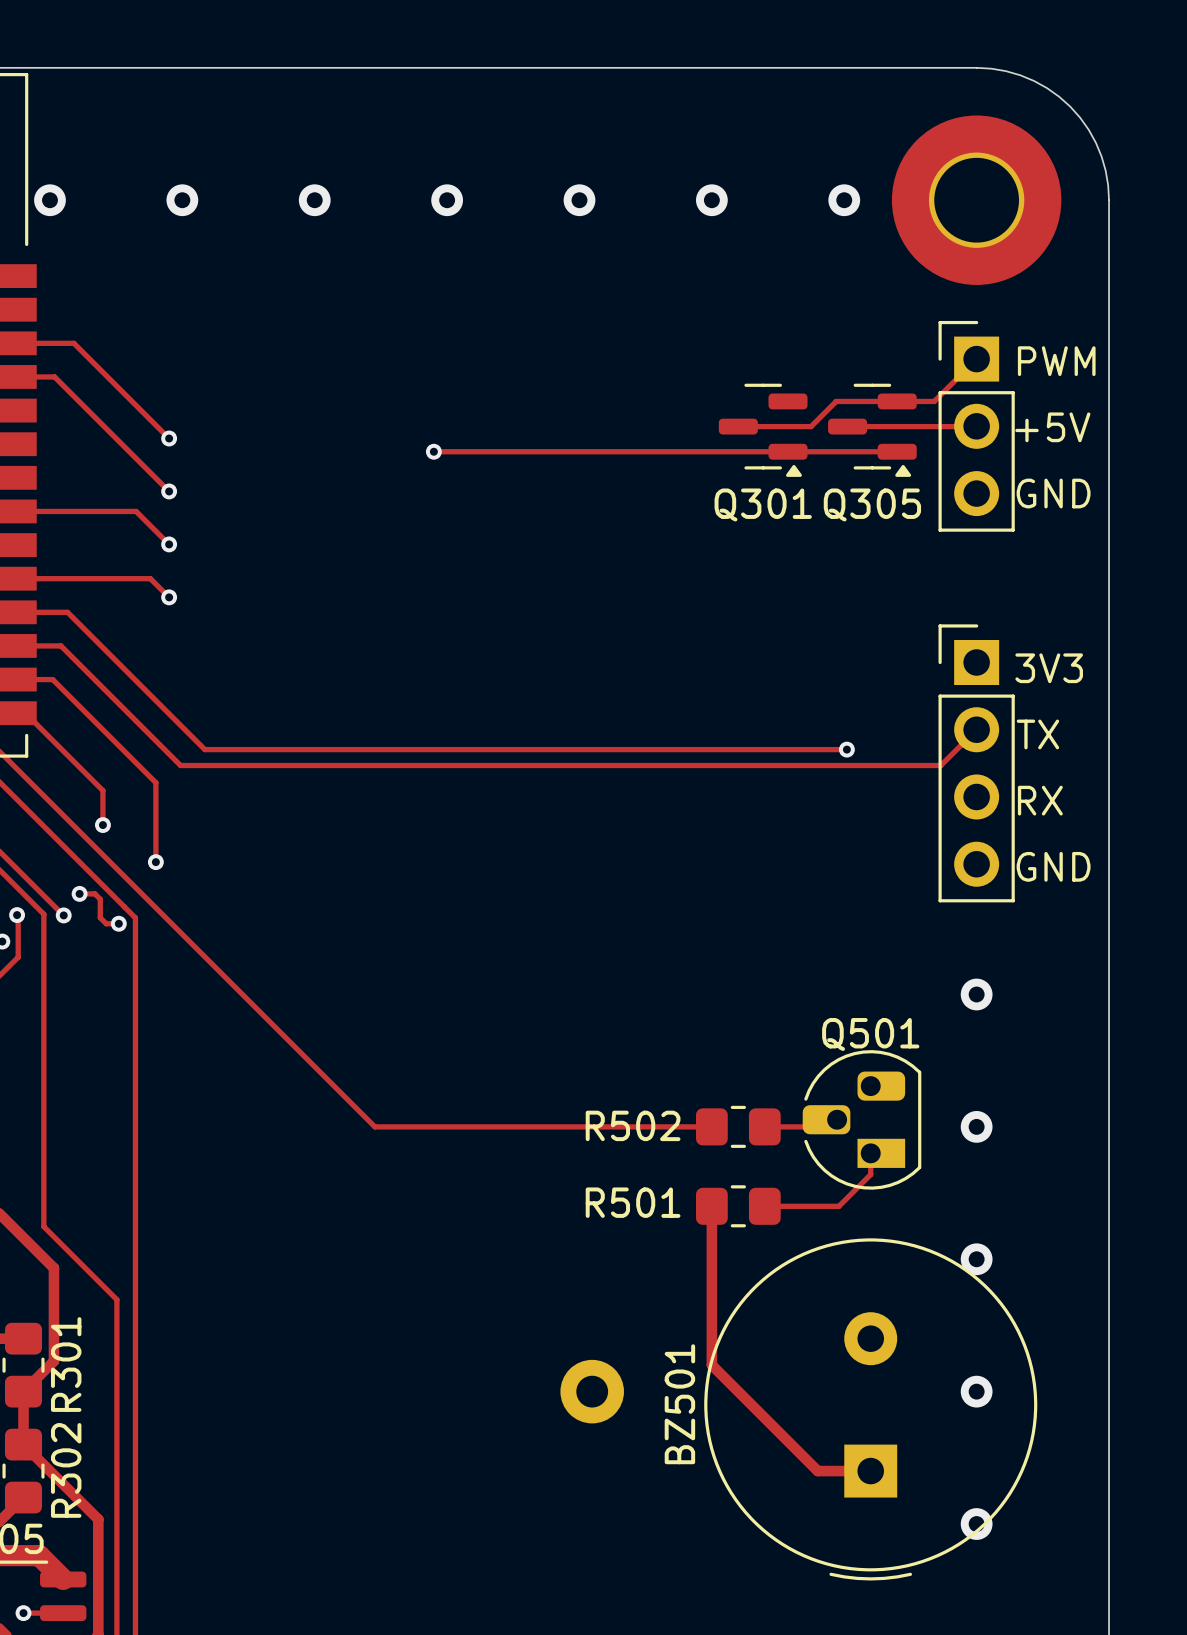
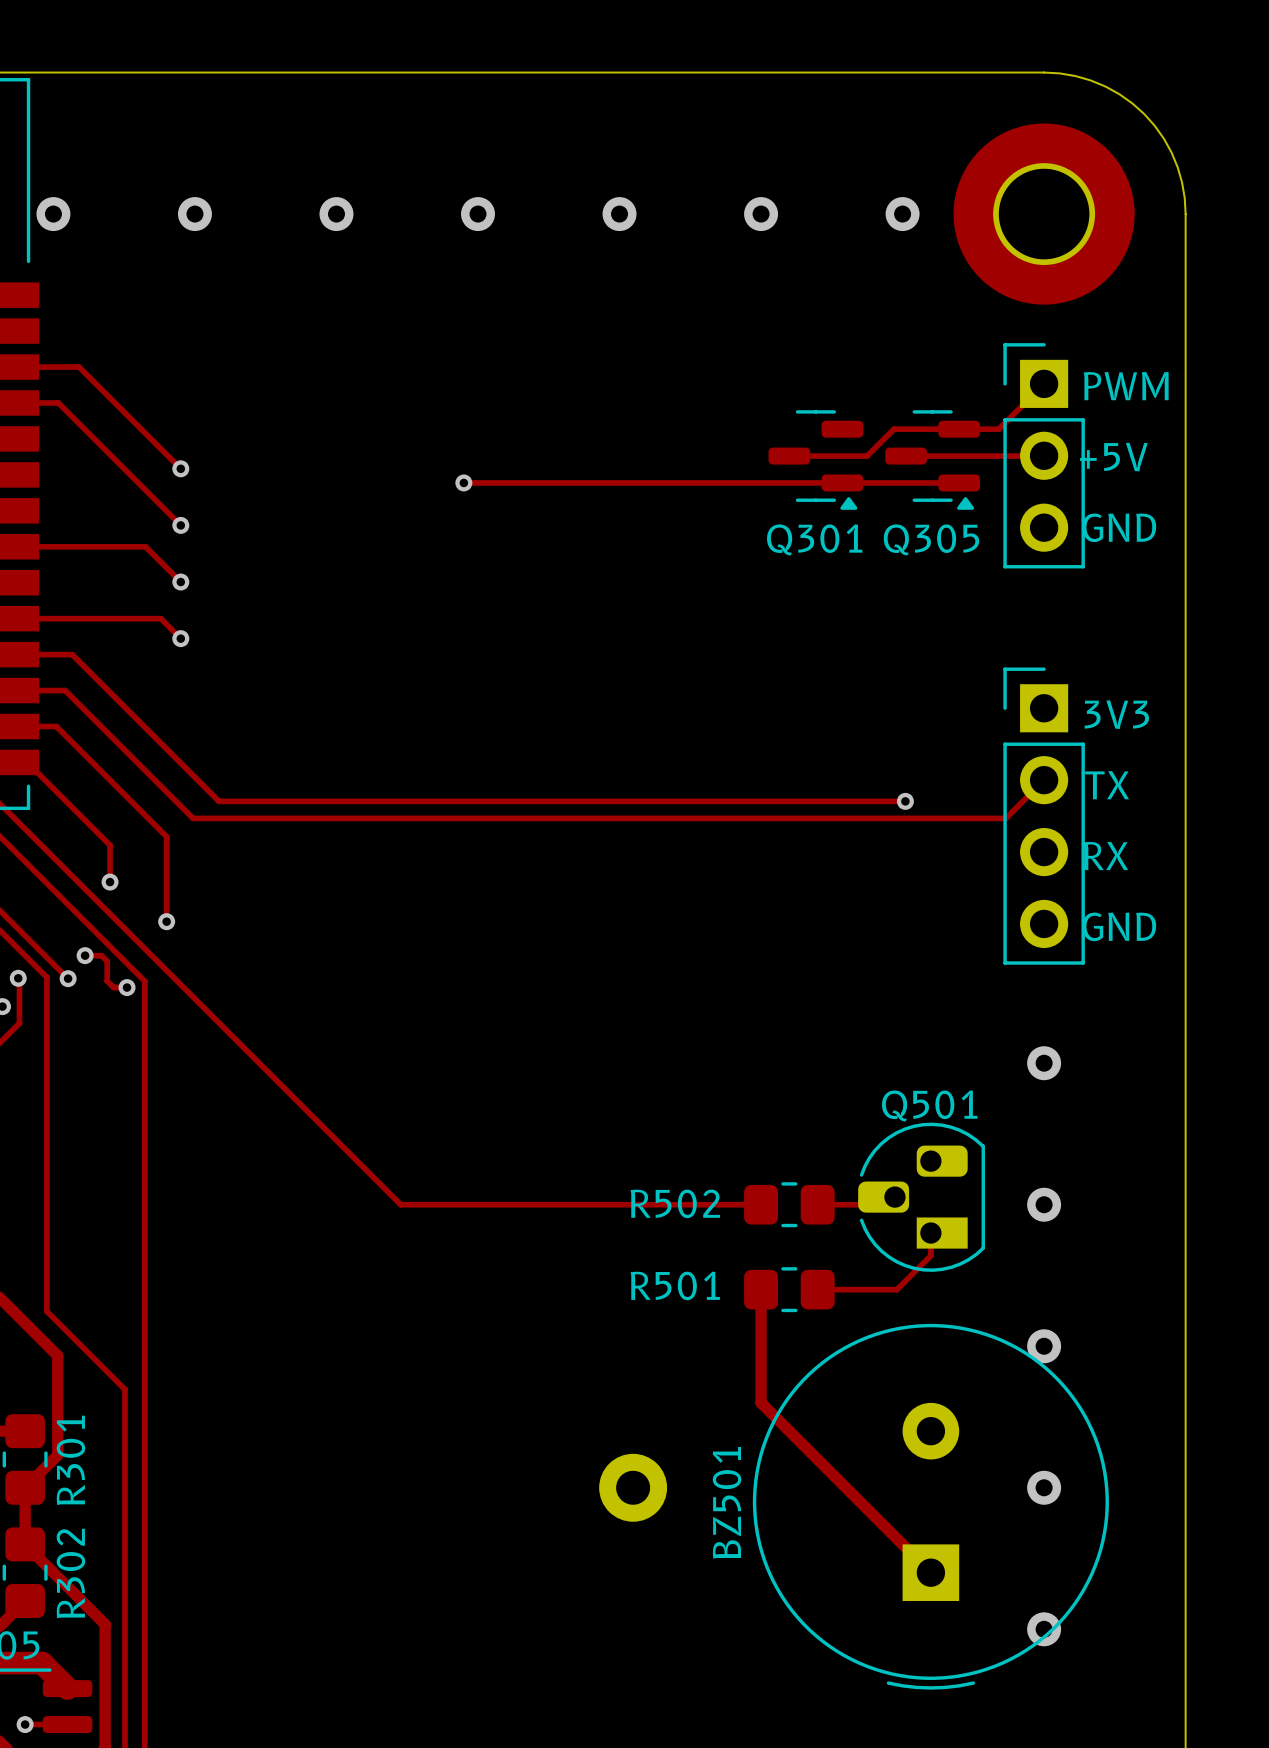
track: (711, 1312) (711, 1365) (817, 1471) (870, 1471) -> (761, 1402) (930, 1572)

